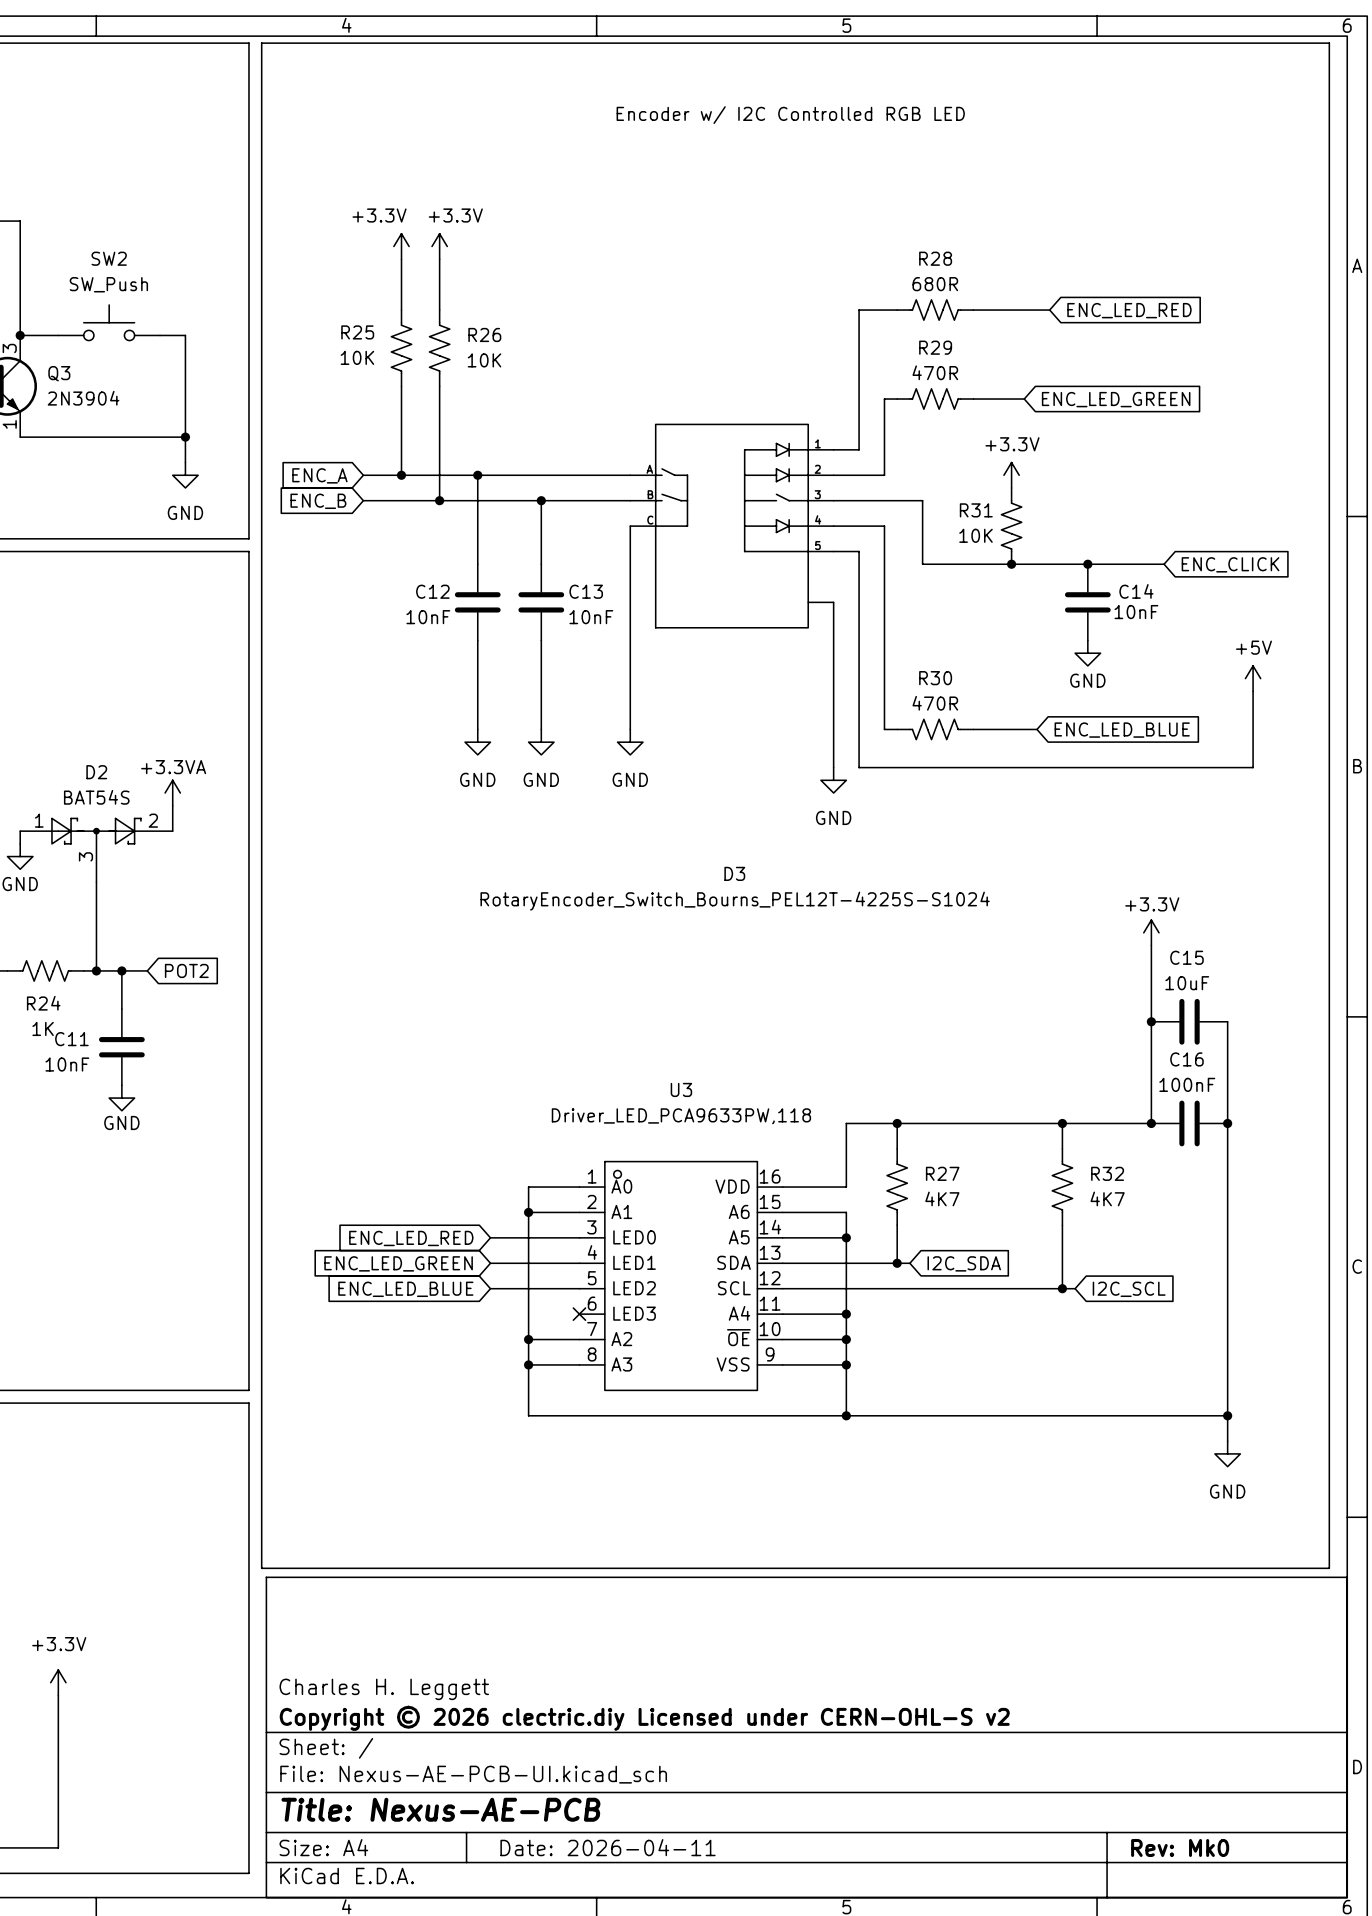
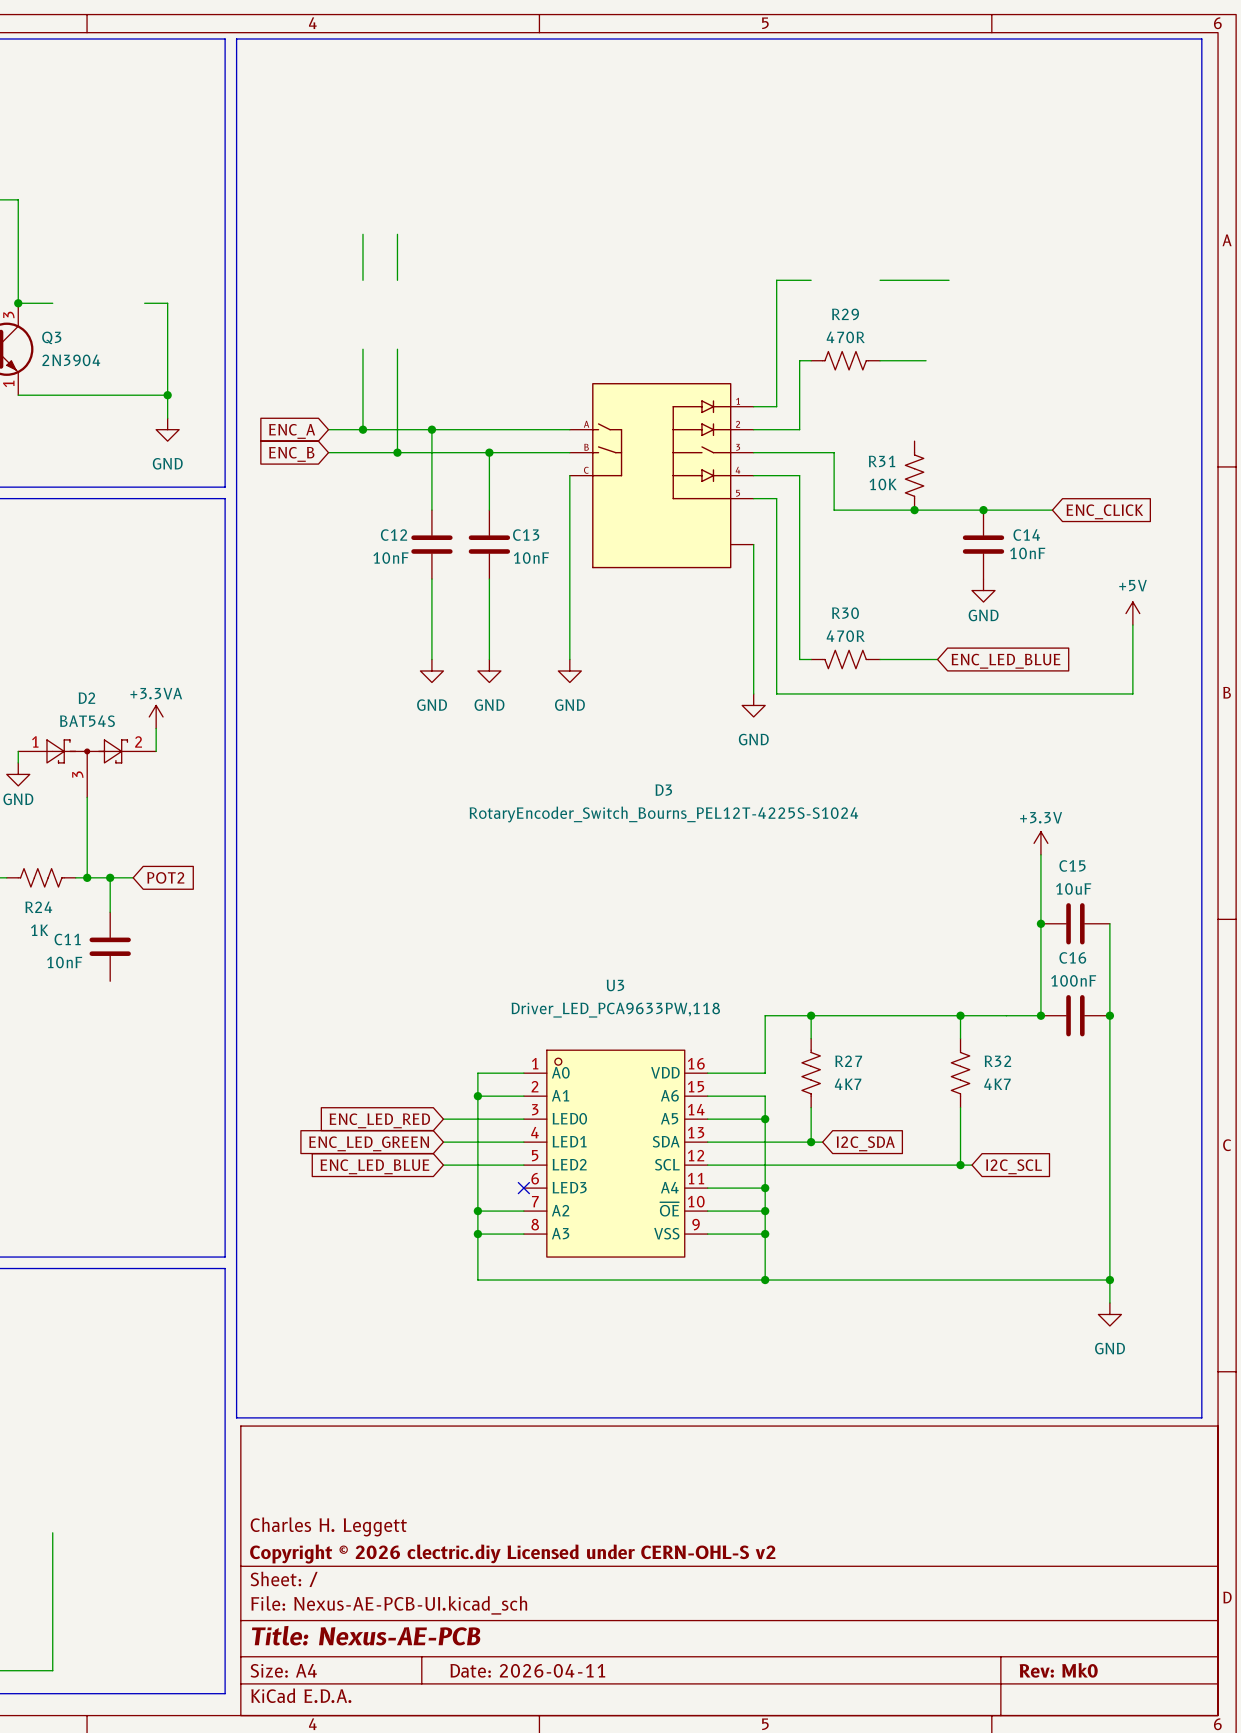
text: Encoder w/ I2C Controlled RGB LED (790, 115) -> none
power symbol: +3.3V (401, 246) -> none
power symbol: +3.3V (439, 246) -> none
R28: 680R (935, 310) -> none
global label: ENC_LED_RED (1129, 310) -> none
SW2: SW_Push (109, 322) -> none
R25: 10K (401, 348) -> none
R26: 10K (439, 348) -> none
global label: ENC_LED_GREEN (1116, 399) -> none
power symbol: +3.3V (1011, 475) -> none
power symbol: GND (121, 1098) -> none
power symbol: +3.3V (58, 1682) -> none

